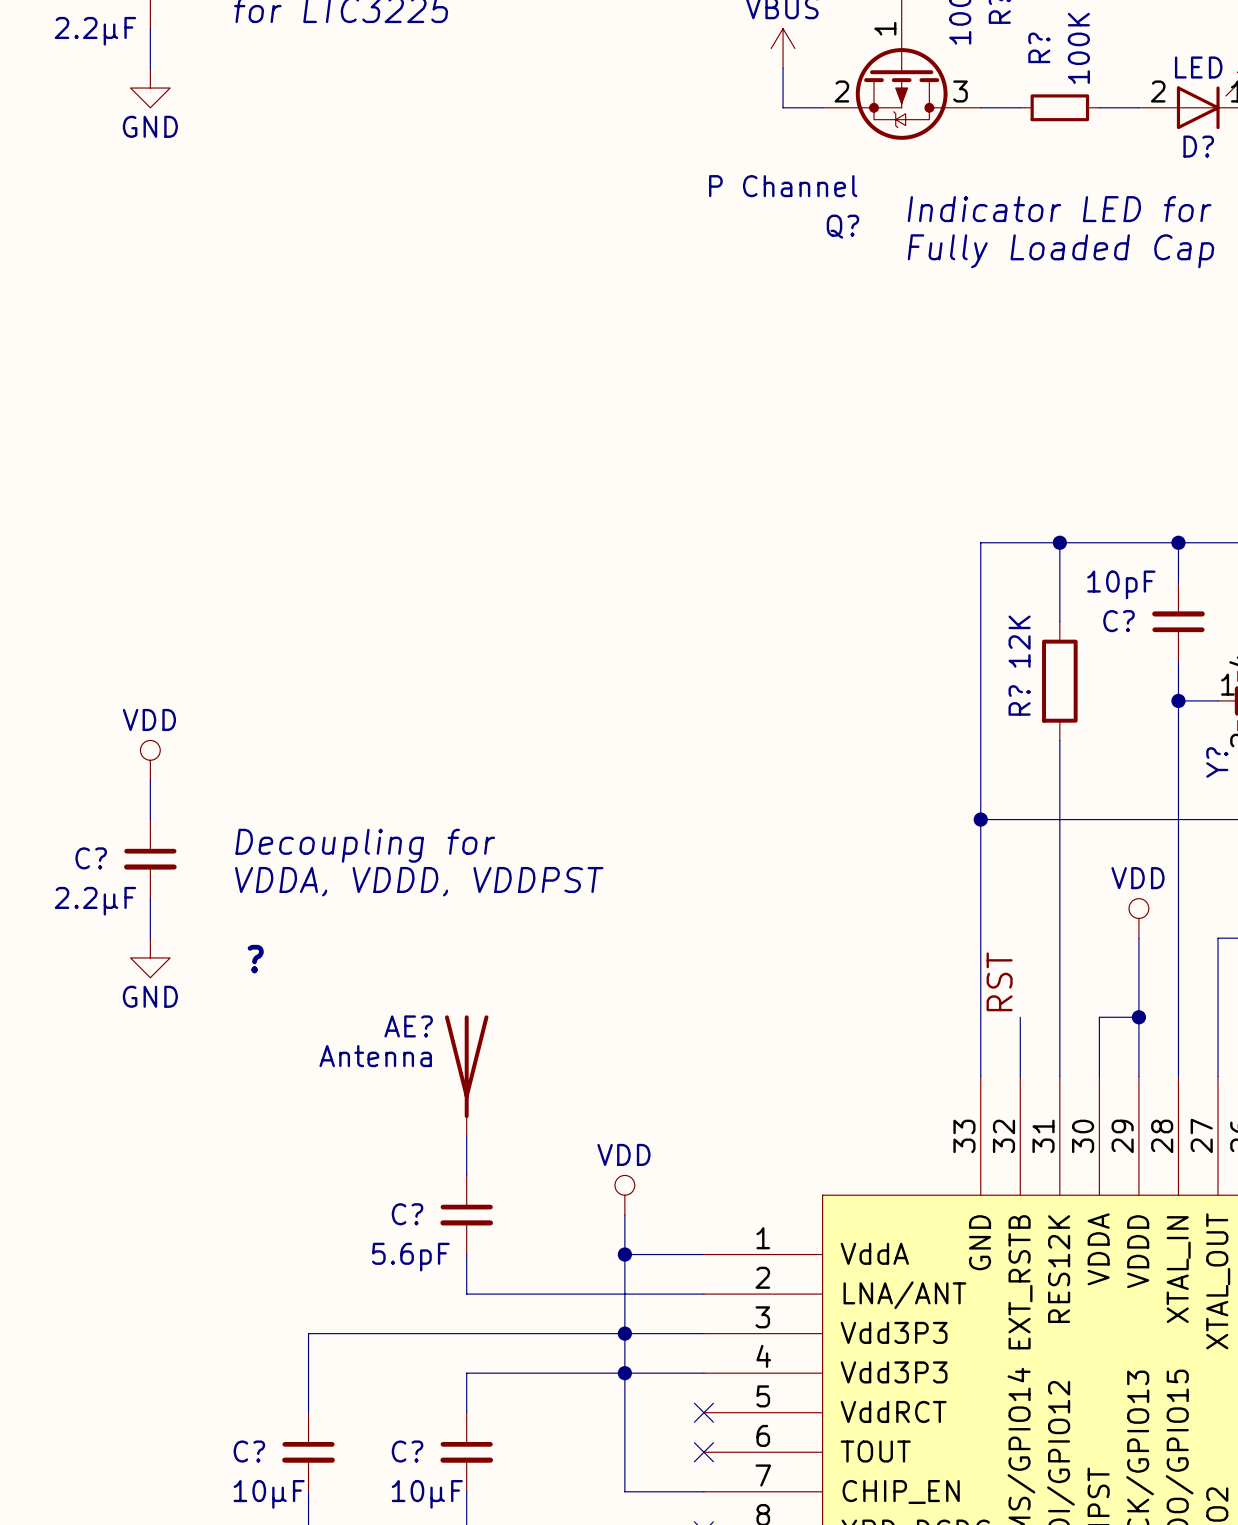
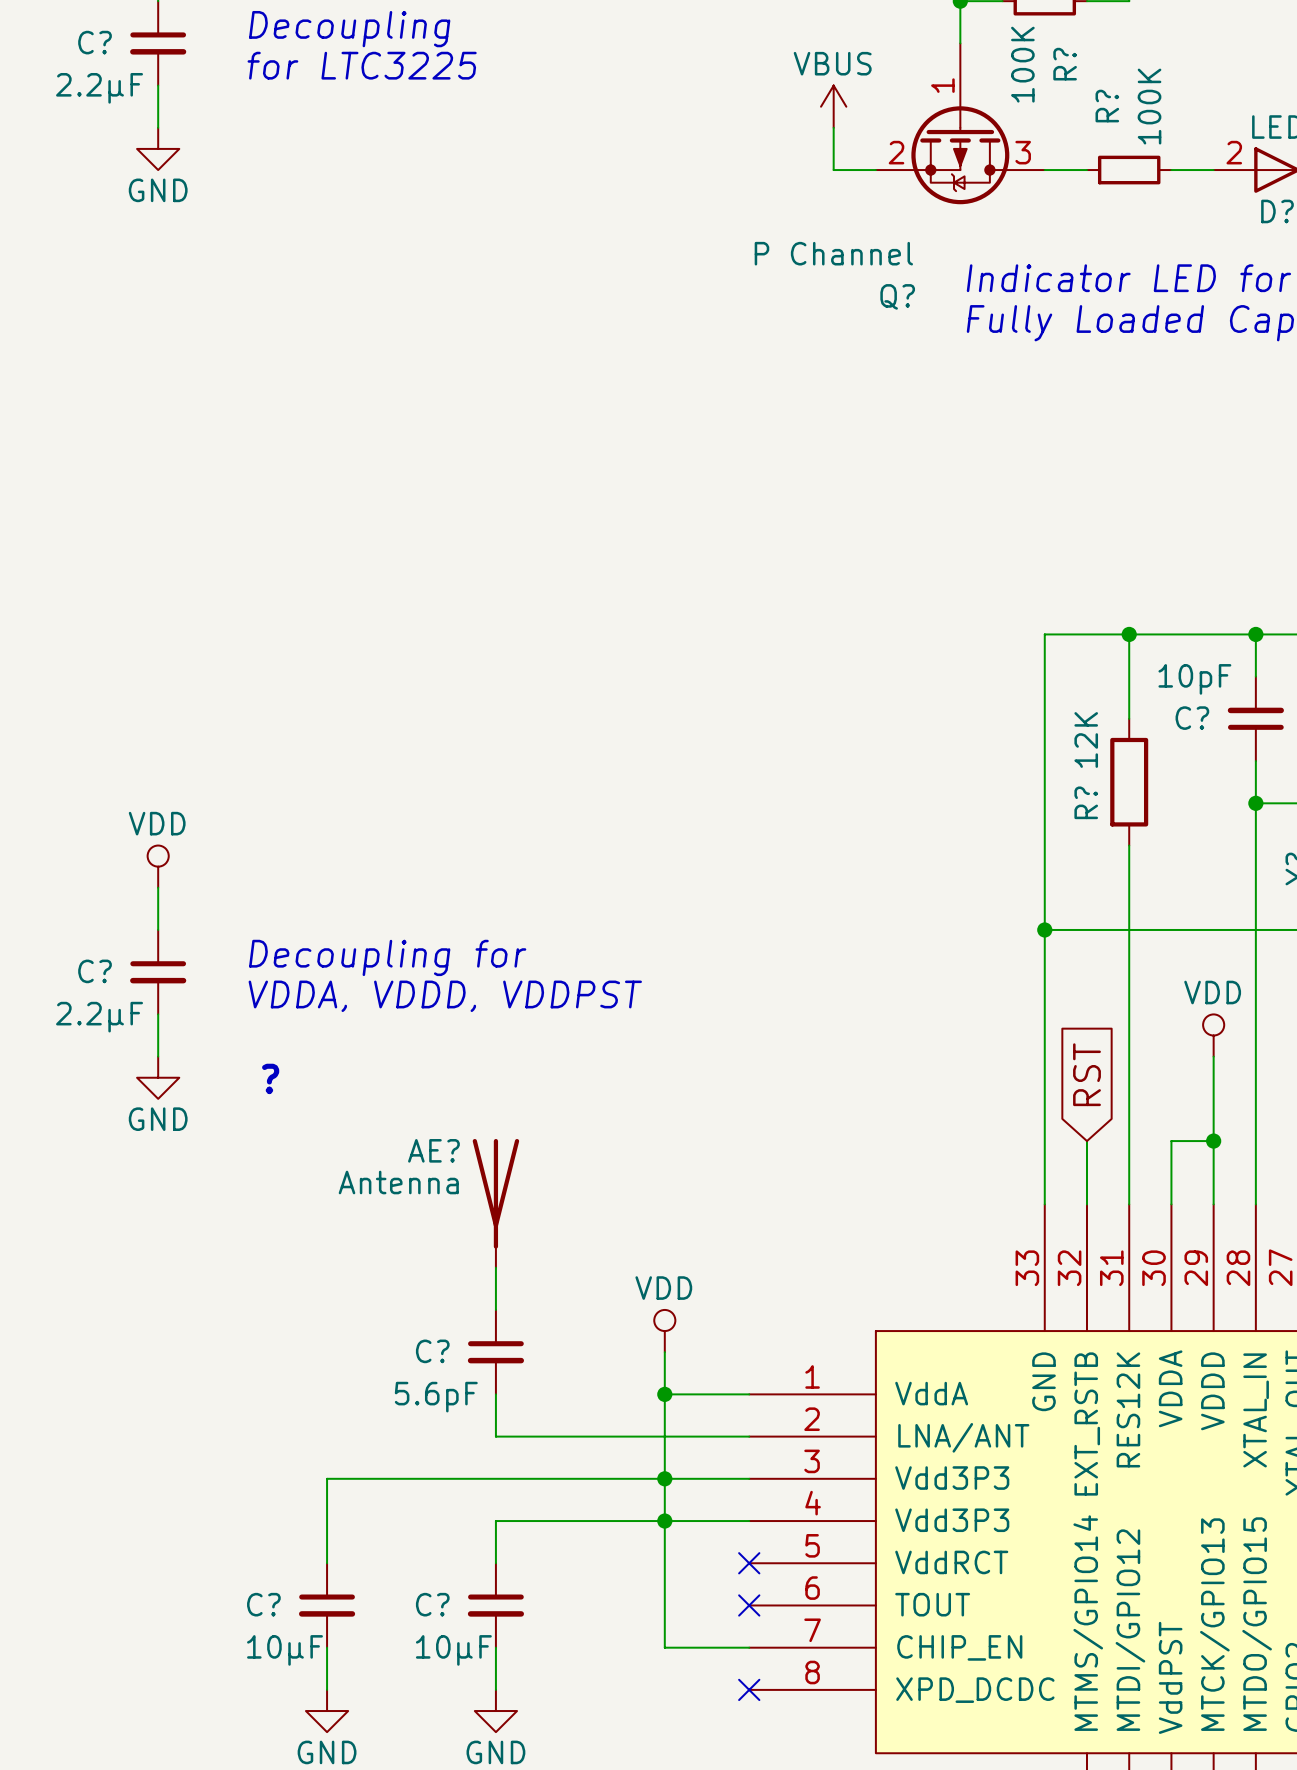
global label: none -> RST (1086, 1074)
label: RST (999, 981) -> none

